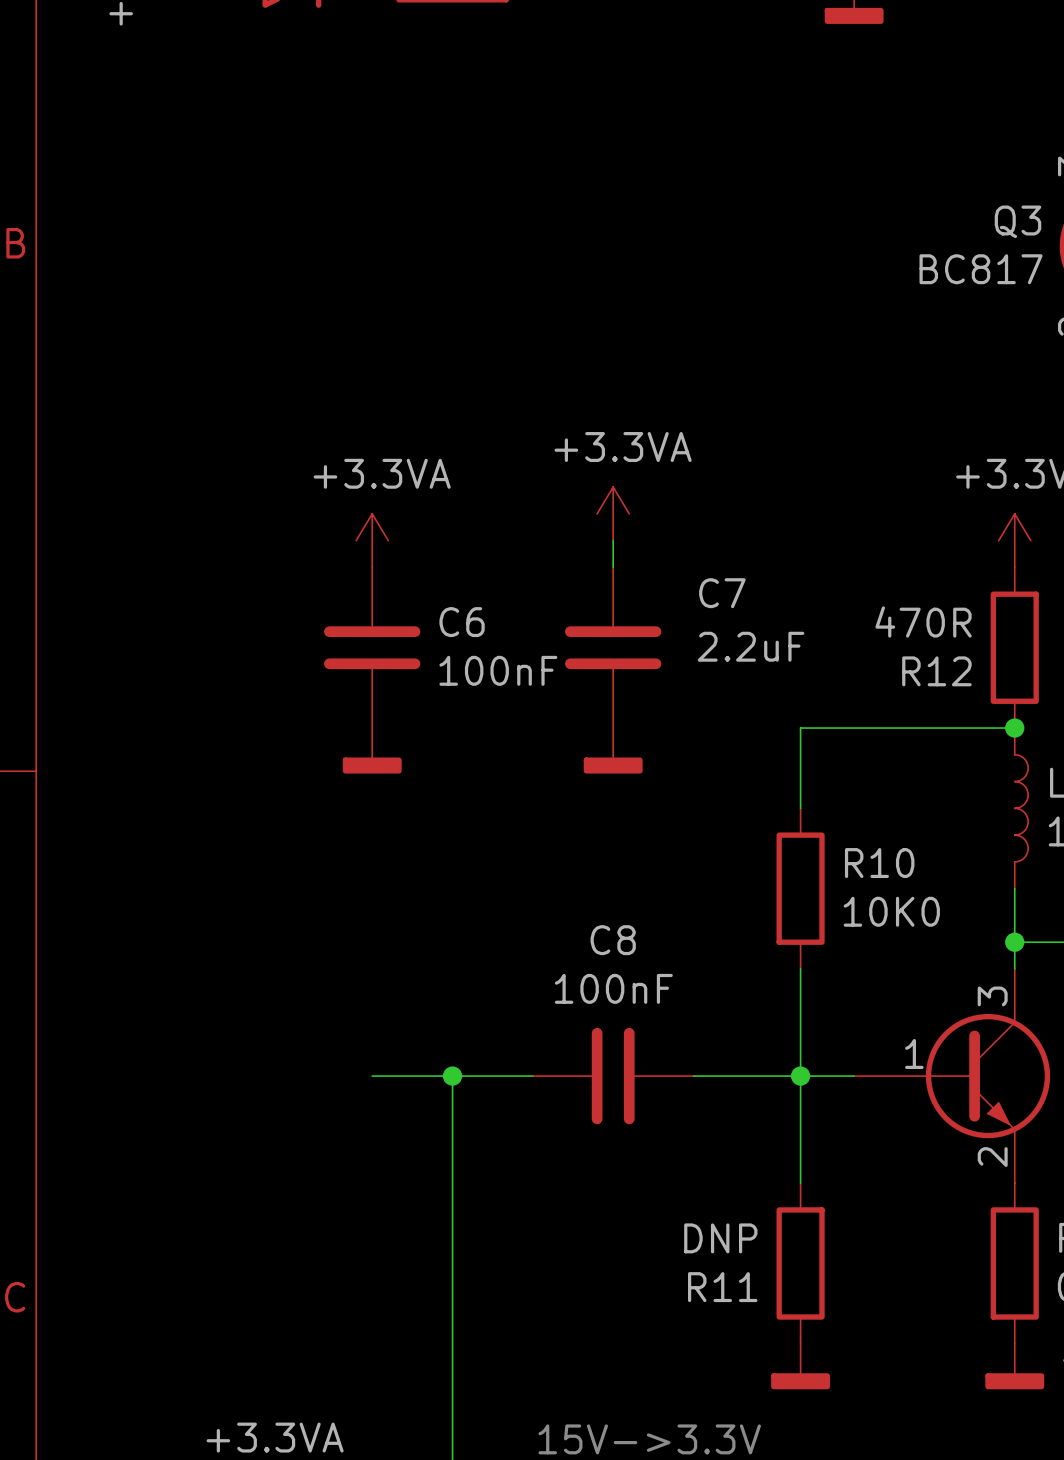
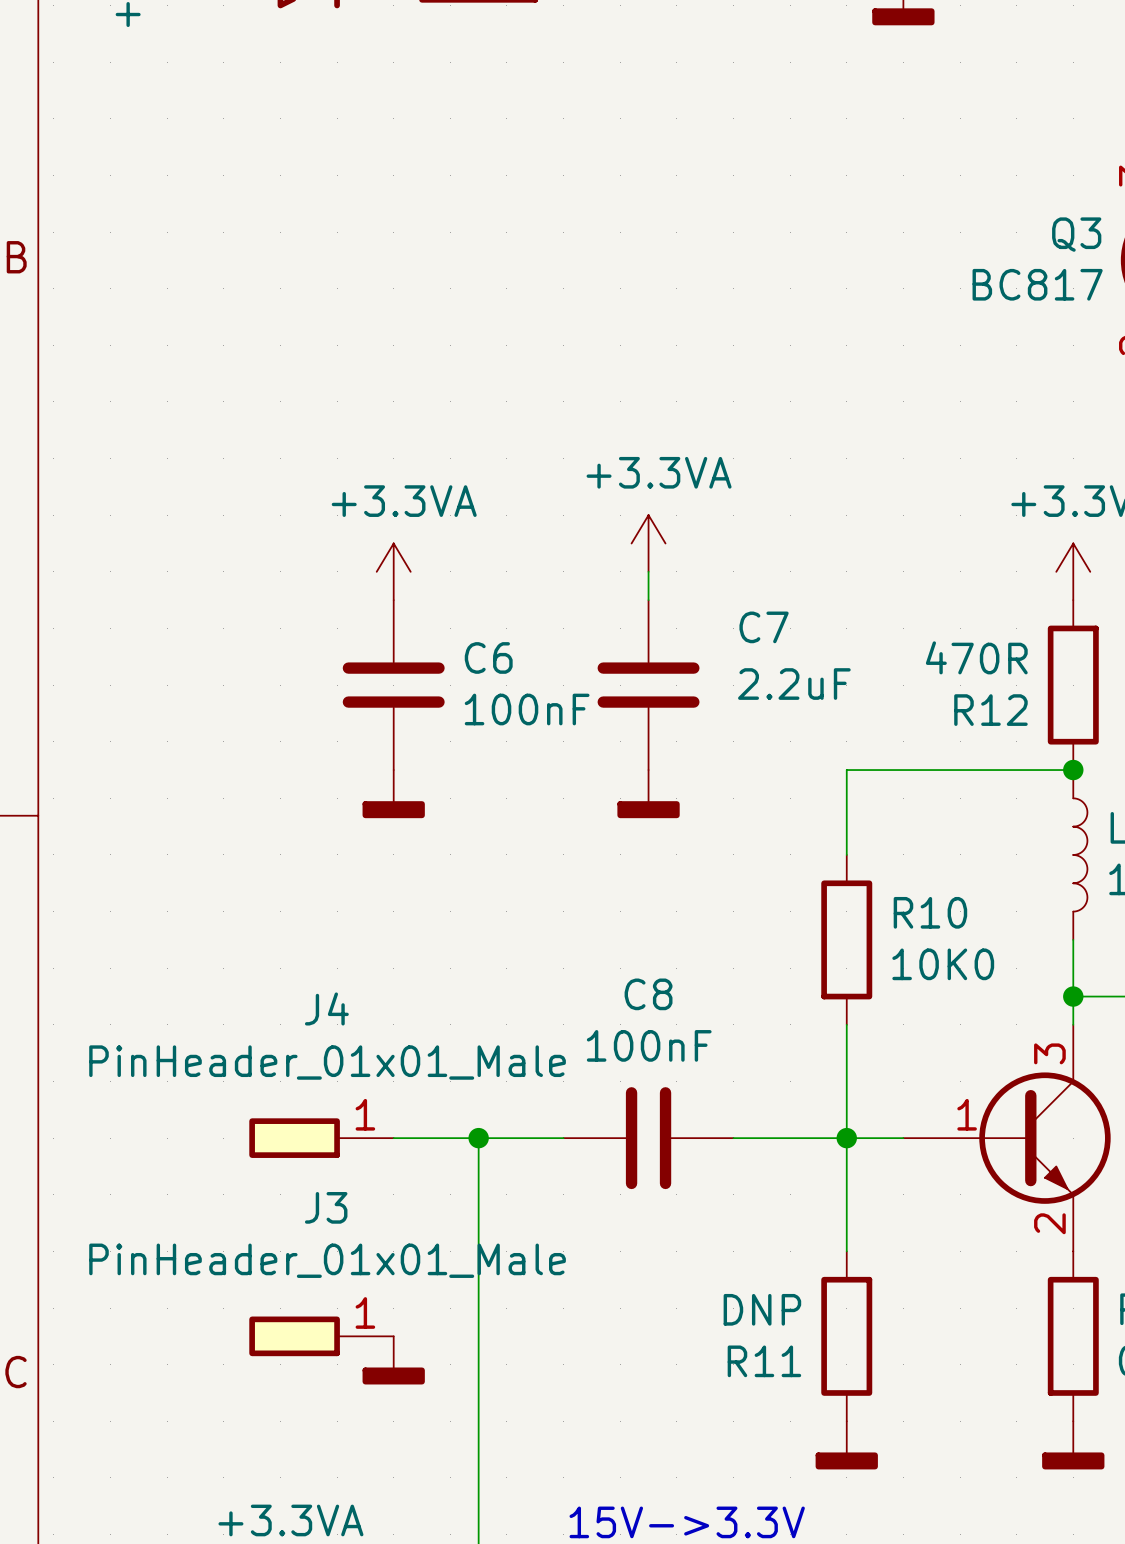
J4: none -> (321, 1138)
J3: none -> (321, 1336)
power symbol: none -> (393, 1360)

